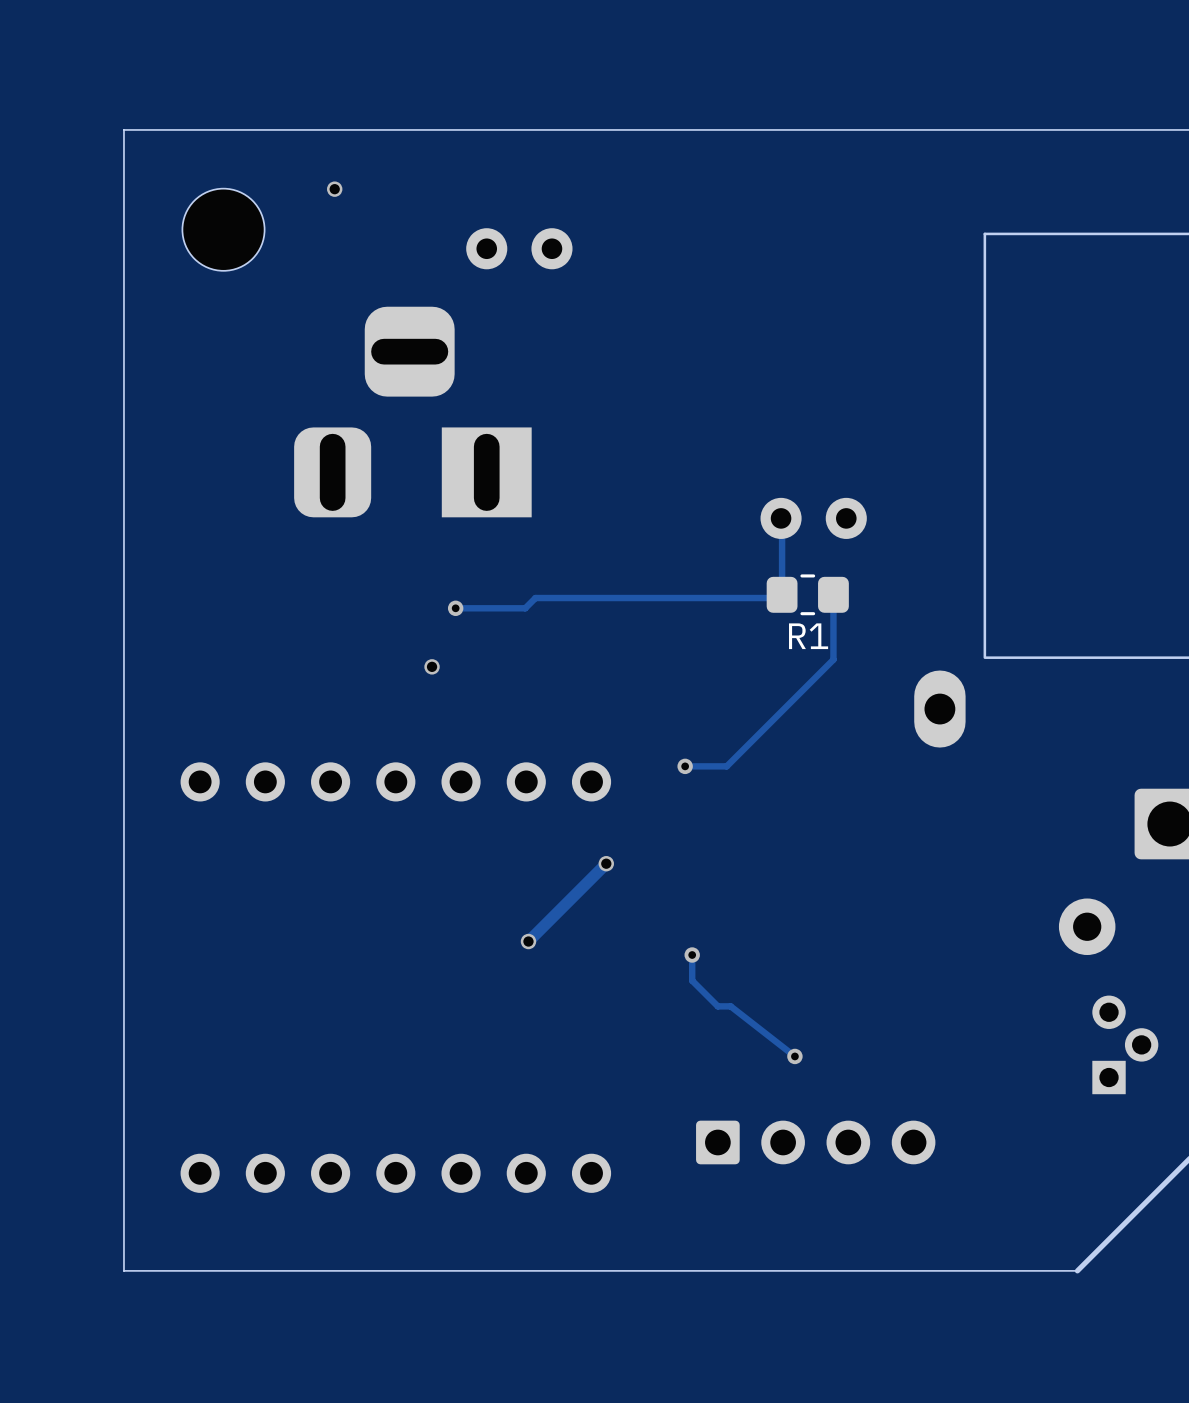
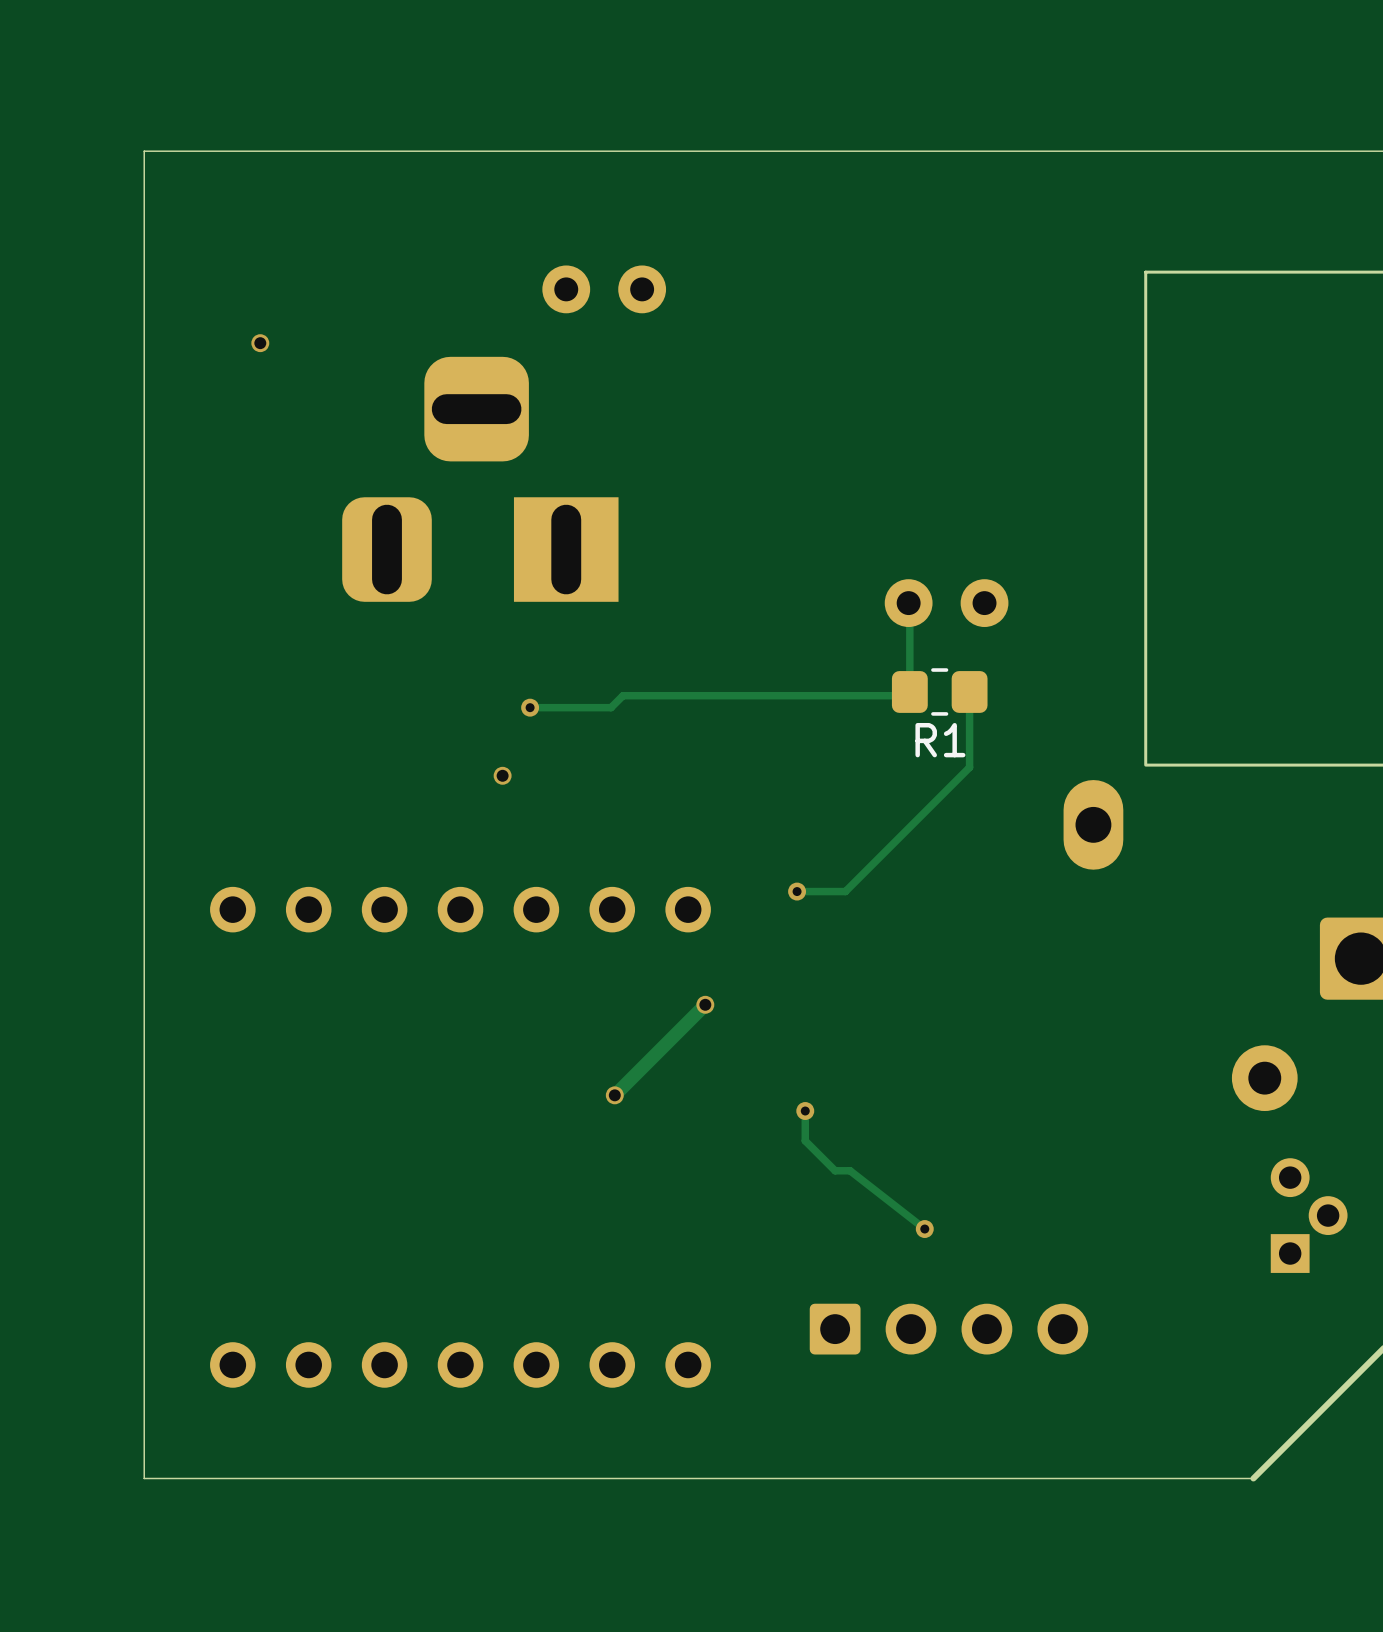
via position: (334, 189) -> (260, 343)
part: (223, 229) -> none

